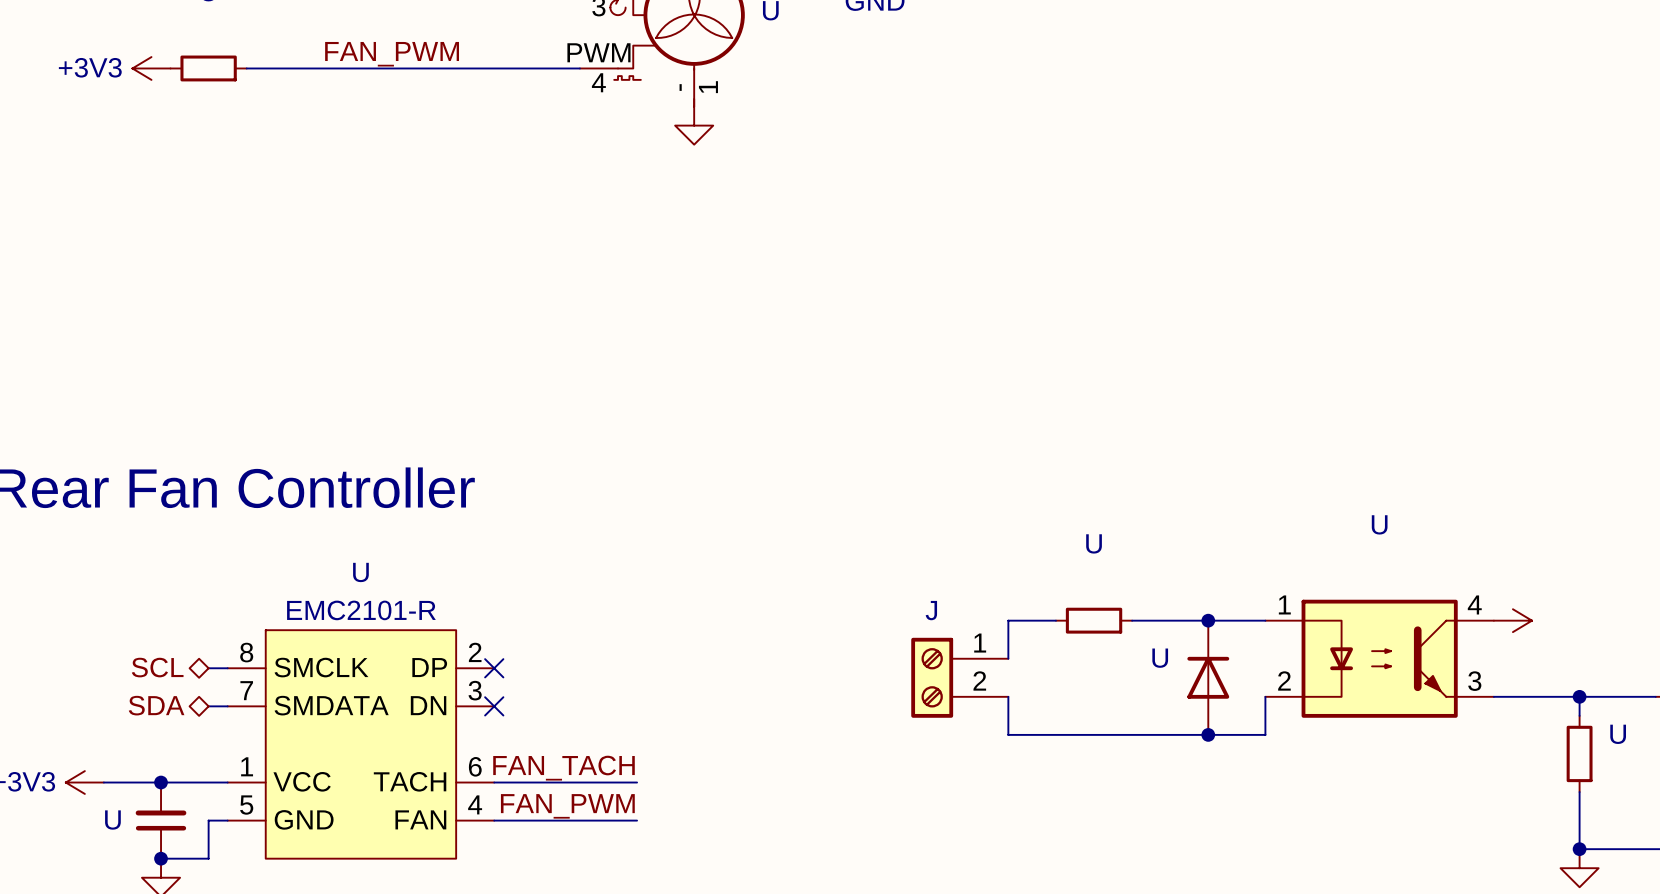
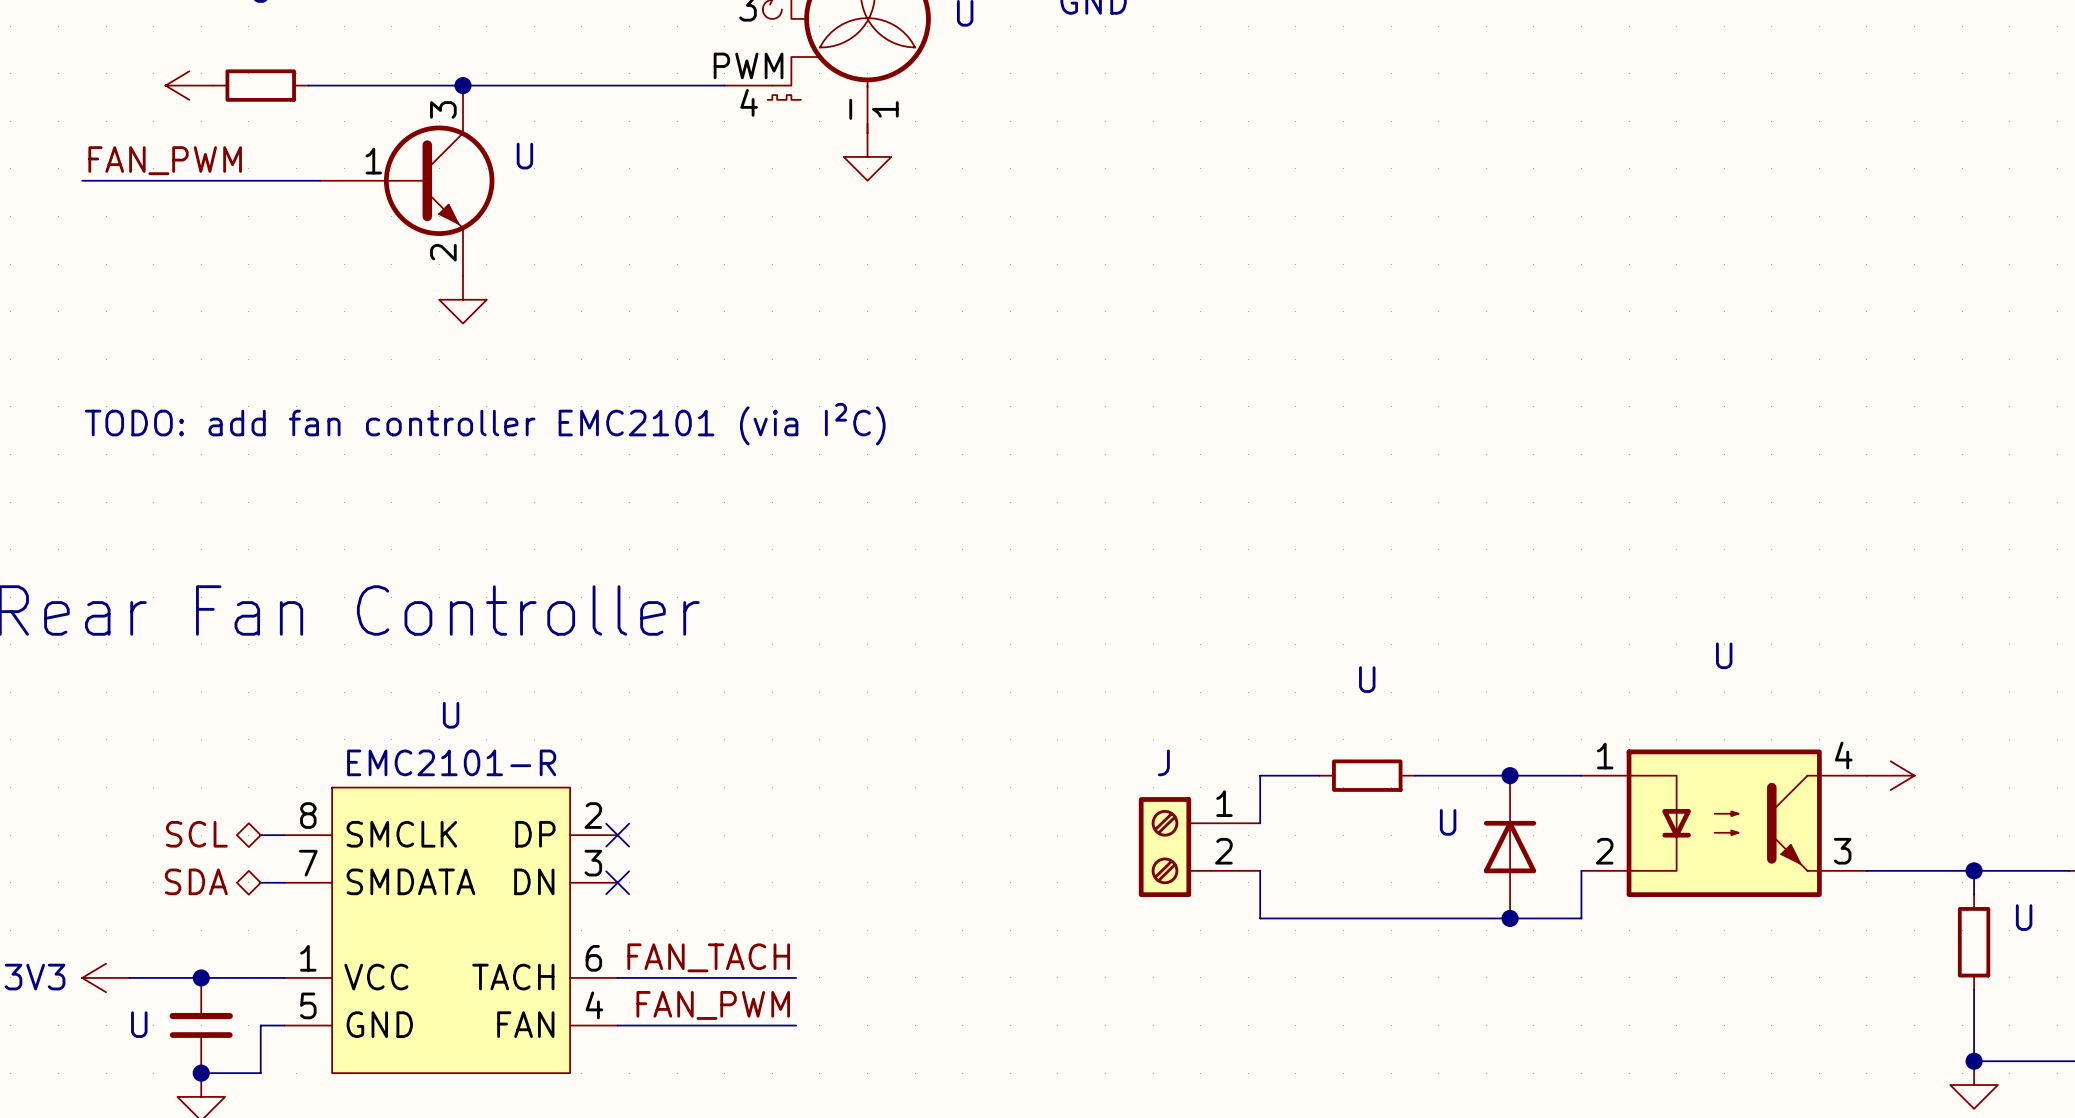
label position: FAN_PWM (392, 54) -> FAN_PWM (165, 160)
power symbol text: +3V3 (90, 67) -> none
junction: none -> (462, 85)
wire: none -> (82, 180) (320, 180)
U: none -> (407, 180)
power symbol: none -> (462, 299)
text: none -> TODO: add fan controller EMC2101 (via I²C) (485, 424)

